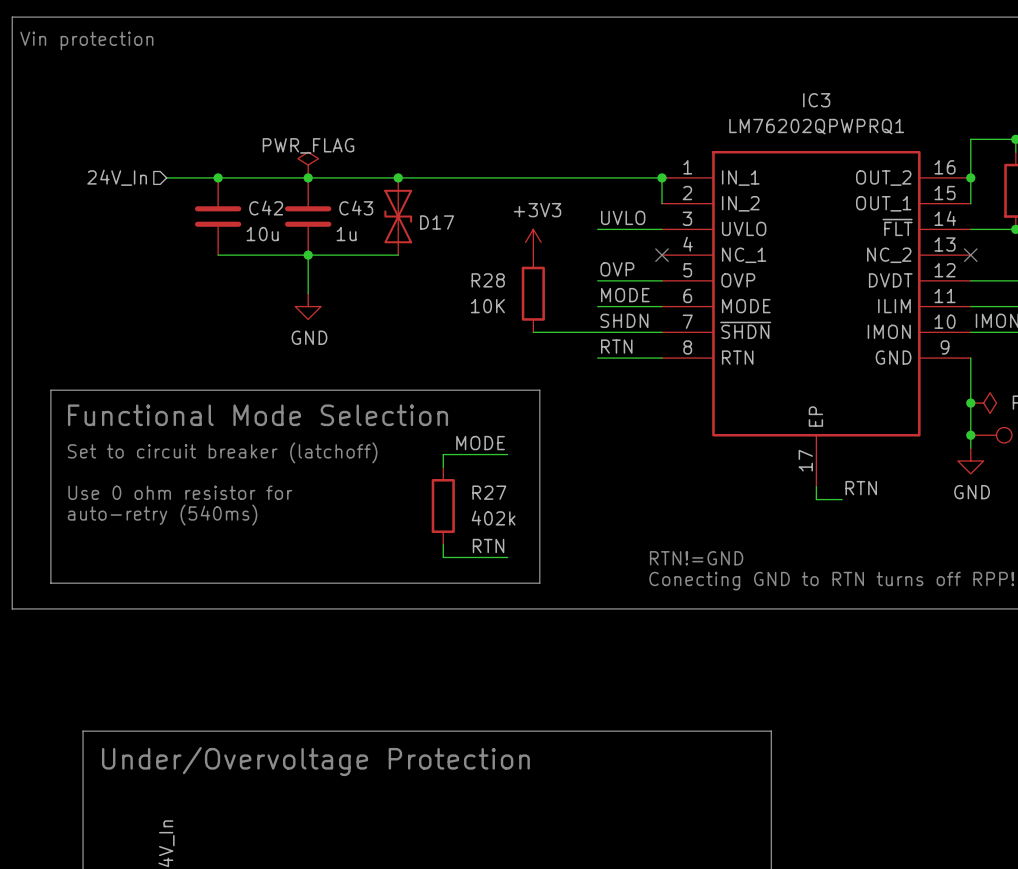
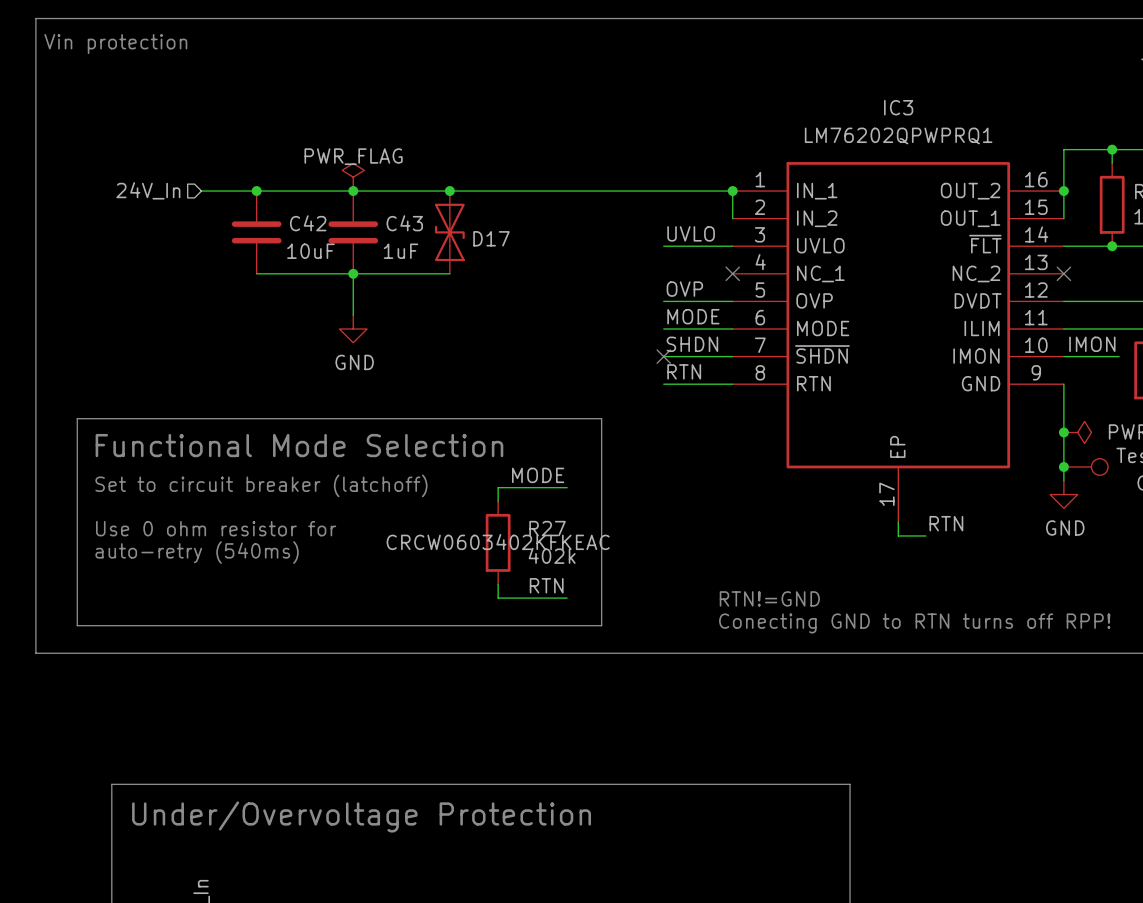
C42 value: 10u (262, 234) -> 10uF (310, 251)
C43 value: 1u (346, 234) -> 1uF (401, 251)
power symbol: +3V3 (533, 242) -> none
R28: 10K (533, 293) -> none
wire: (533, 332) (597, 332) -> none
no-connect mark: none -> (663, 356)
R27 text: none -> CRCW0603402KFKEAC (498, 542)

